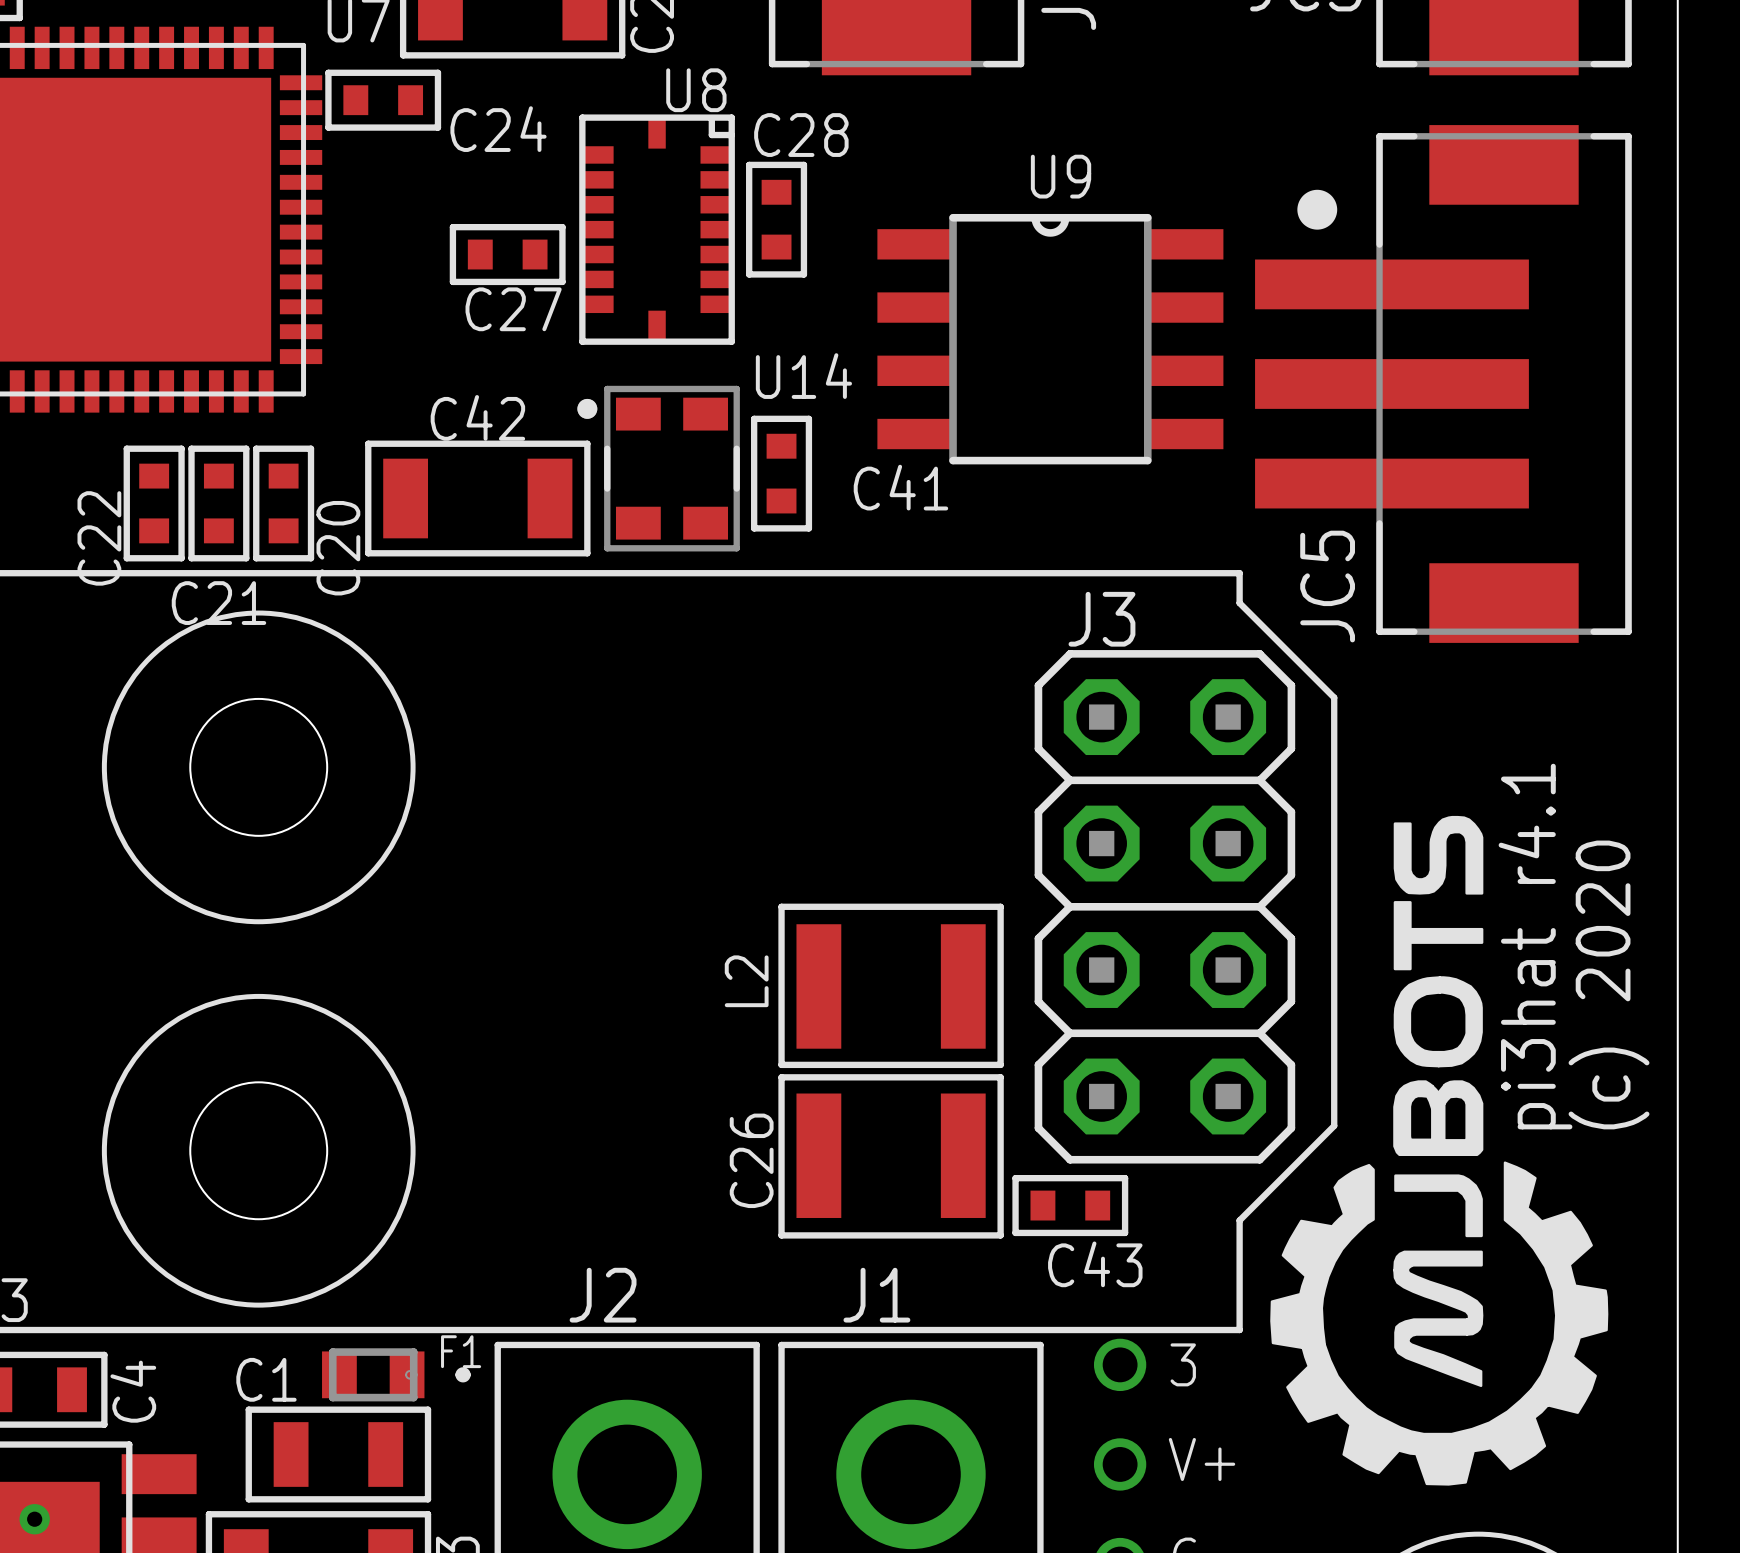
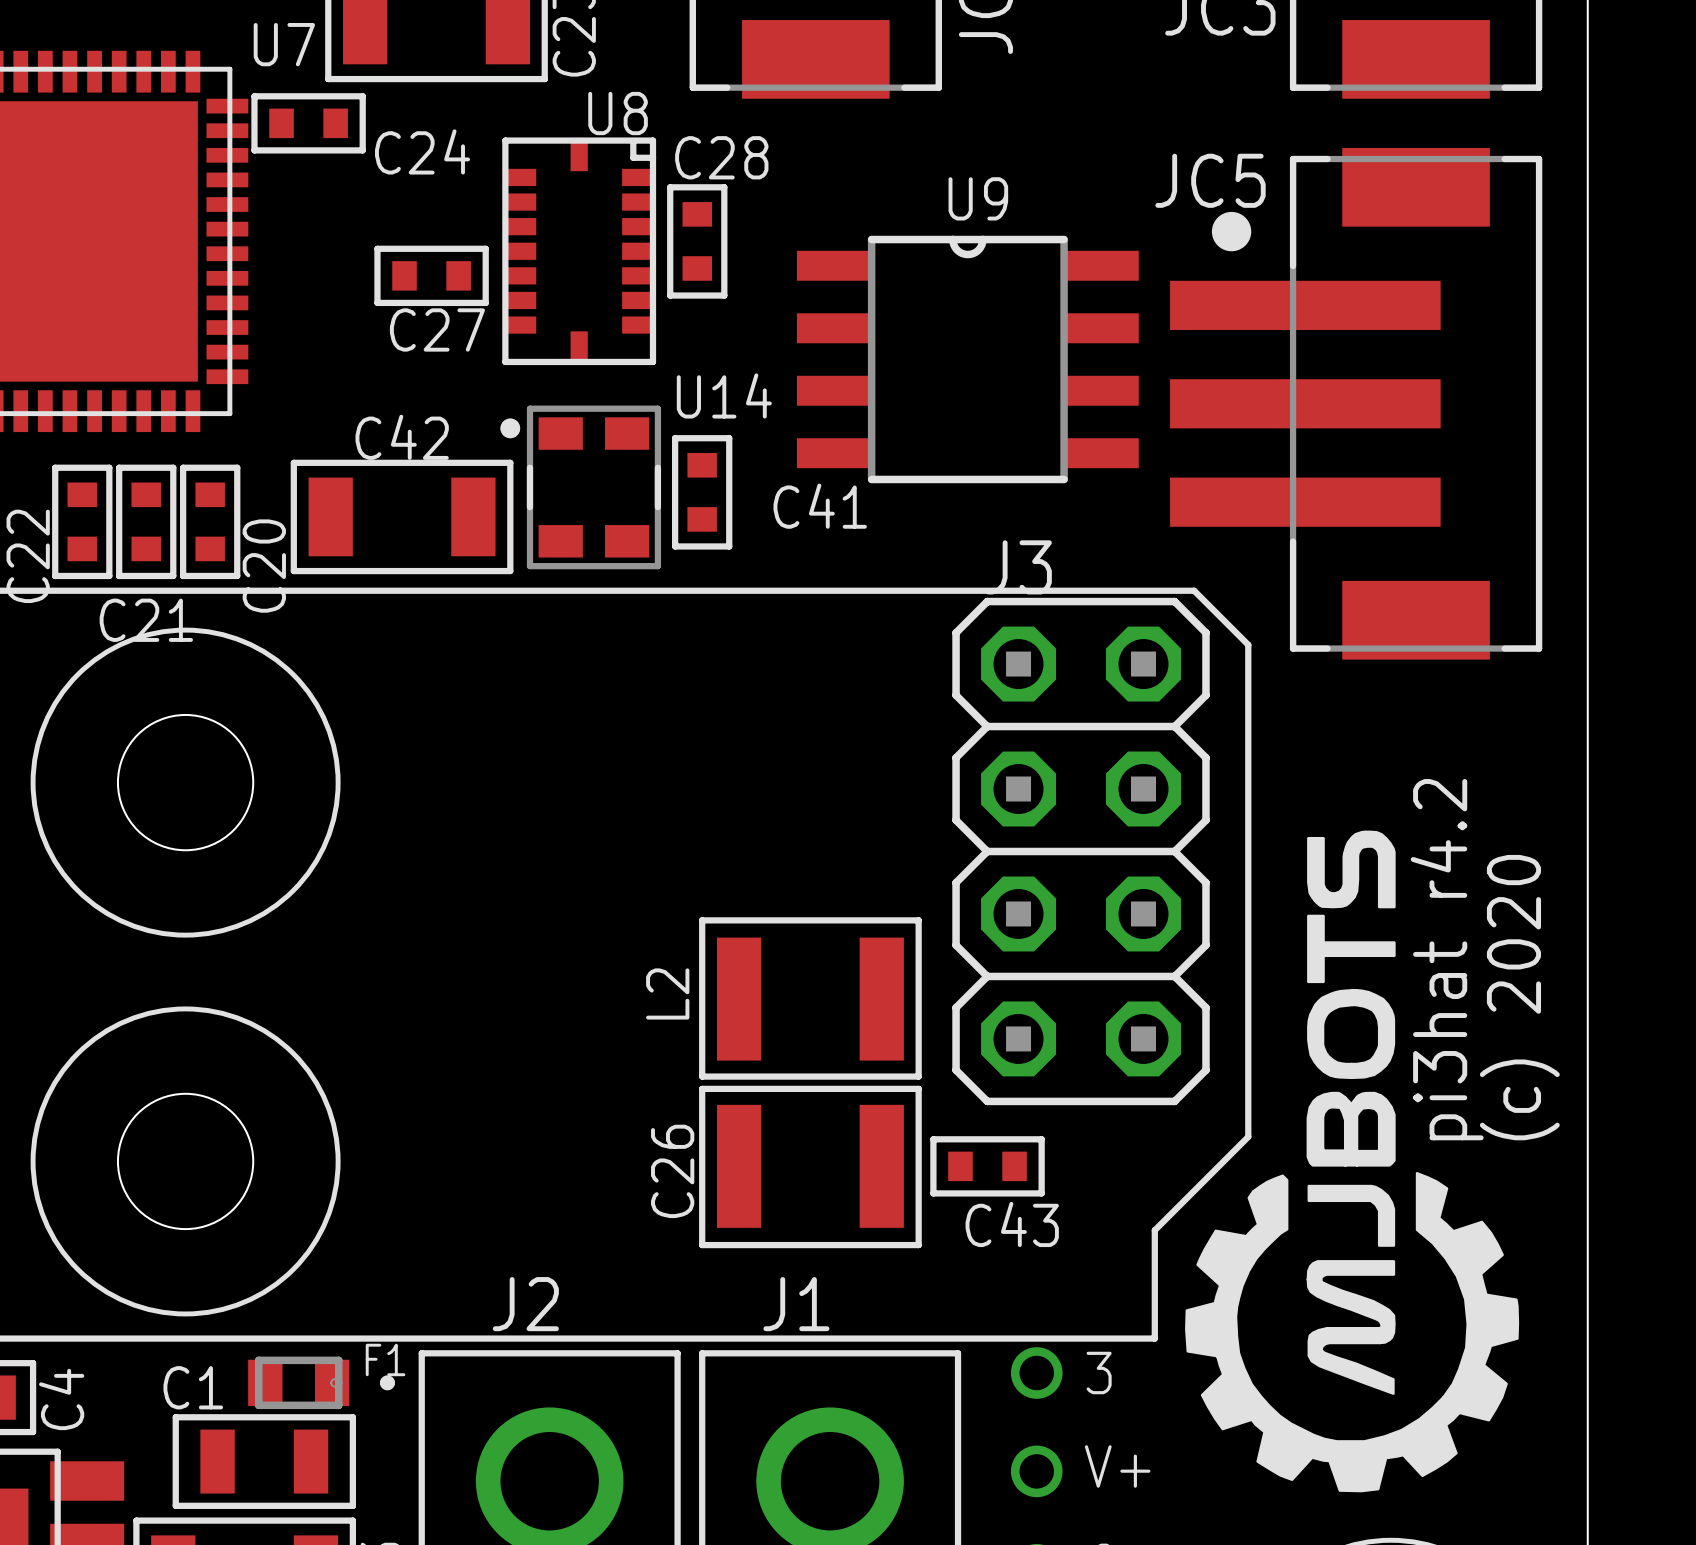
line: (1239, 573) (1239, 603) (1334, 697) -> (1154, 590) (1194, 590) (1248, 644) (1248, 713)
JC5 name rotation: 0° (1327, 586) -> 90° clockwise (1210, 180)
JC5 name position: JC5 (1327, 586) -> JC5 (1210, 180)
J3 position: (1164, 906) -> (1081, 851)
text: pi3hat r4.1 (1535, 946) -> pi3hat r4.2 (1447, 959)
C43 position: (1070, 1205) -> (987, 1166)

